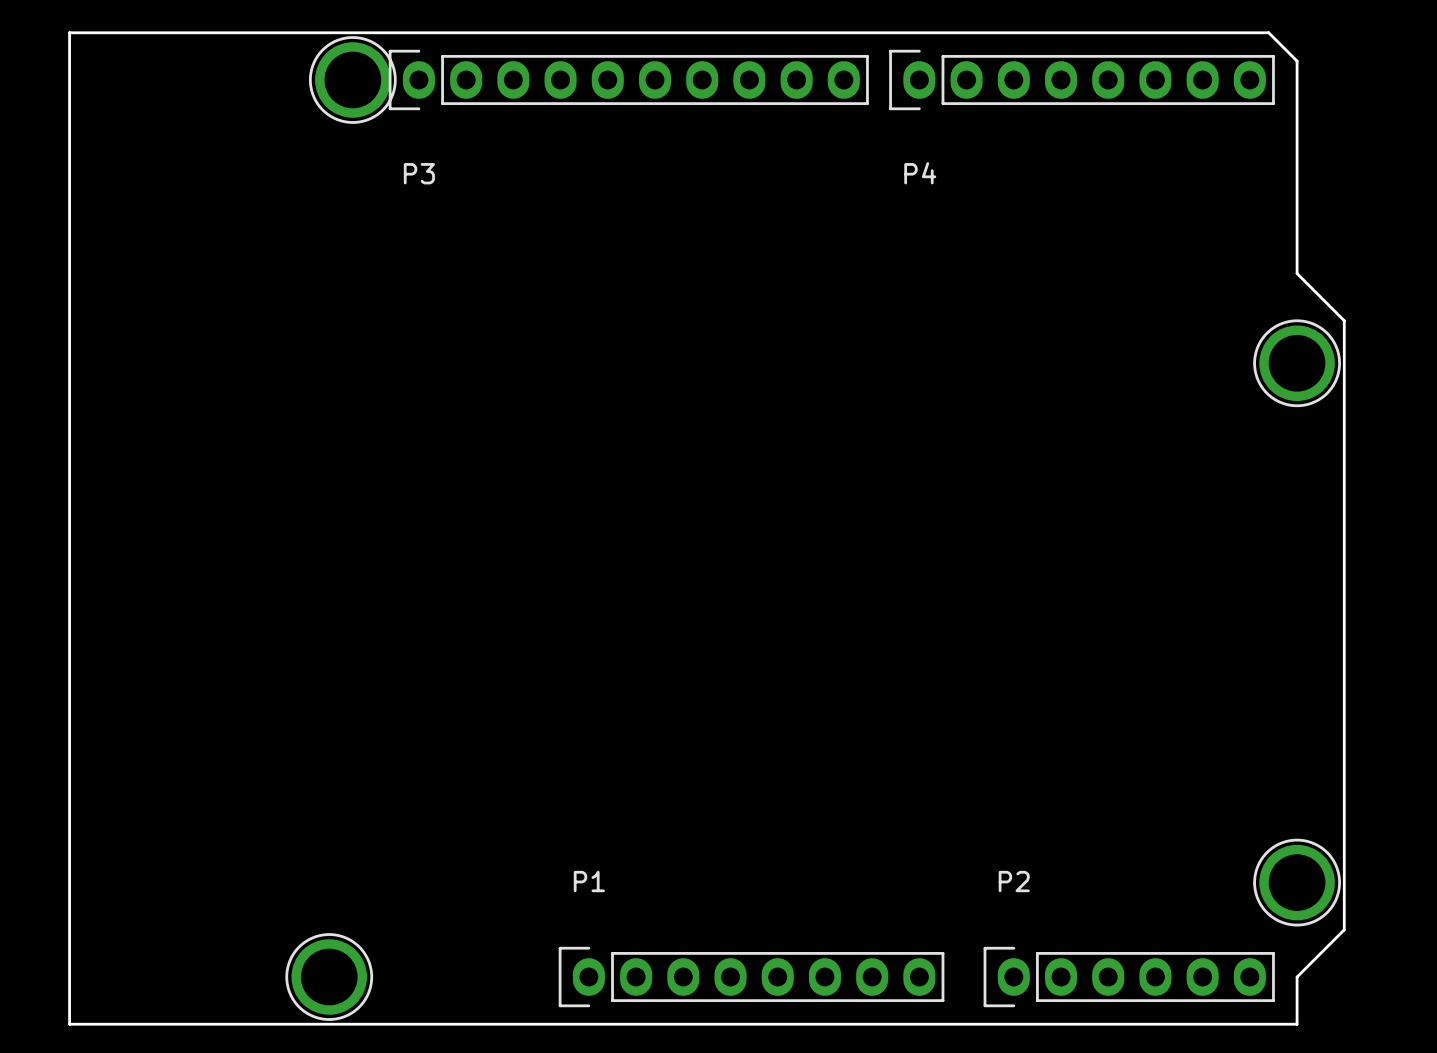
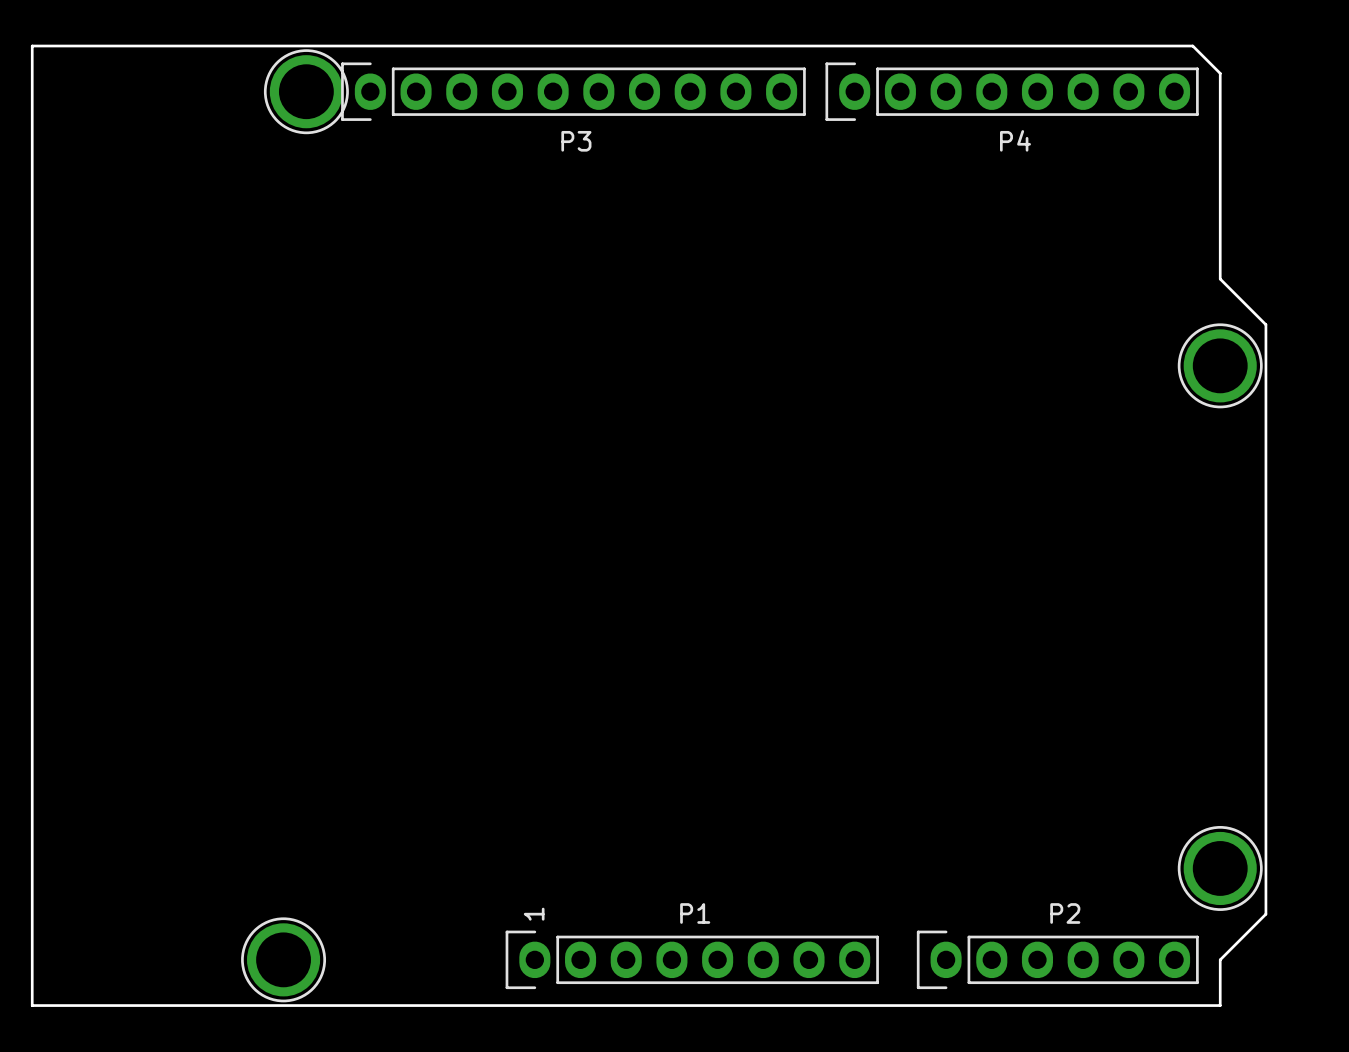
P3 name position: P3 (419, 173) -> P3 (576, 141)
P4 name position: P4 (920, 173) -> P4 (1015, 140)
P1 name position: P1 (589, 881) -> P1 (695, 913)
P2 name position: P2 (1014, 881) -> P2 (1065, 913)
text: none -> 1 (534, 914)

